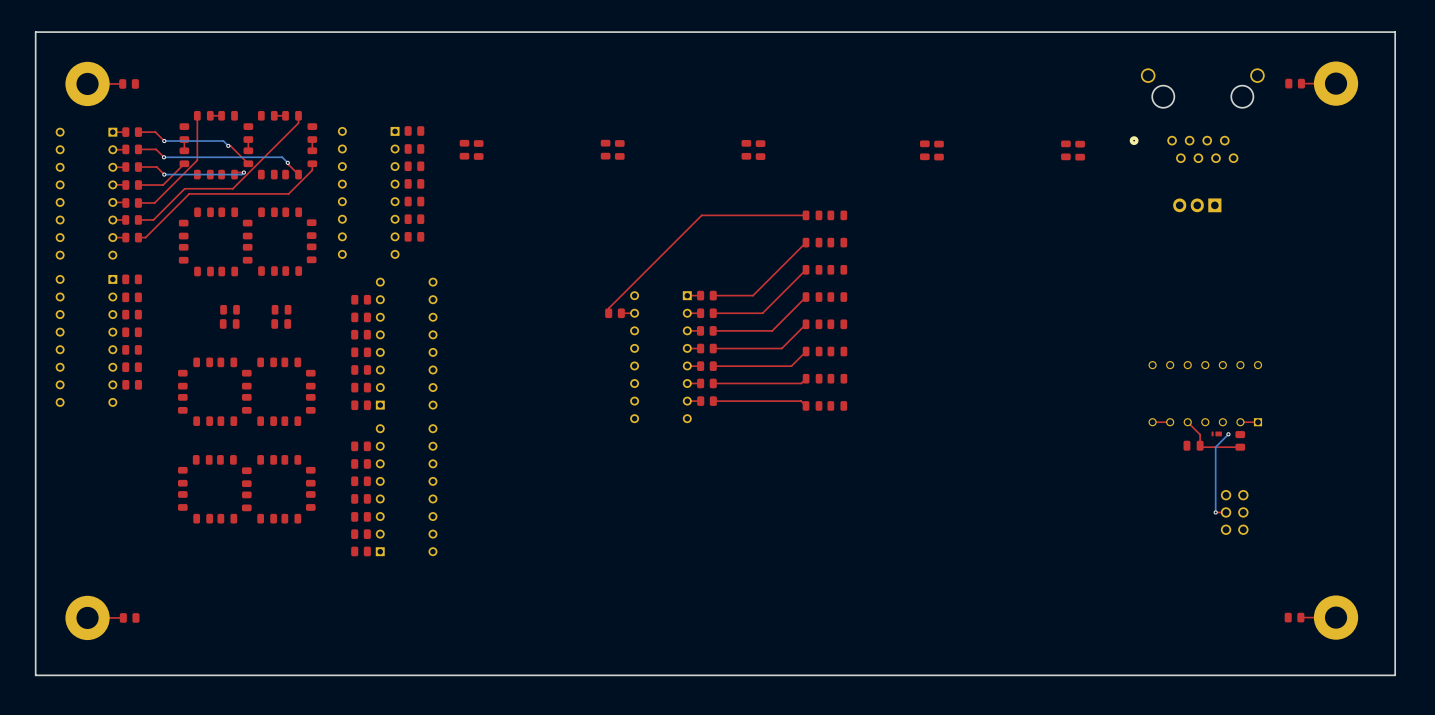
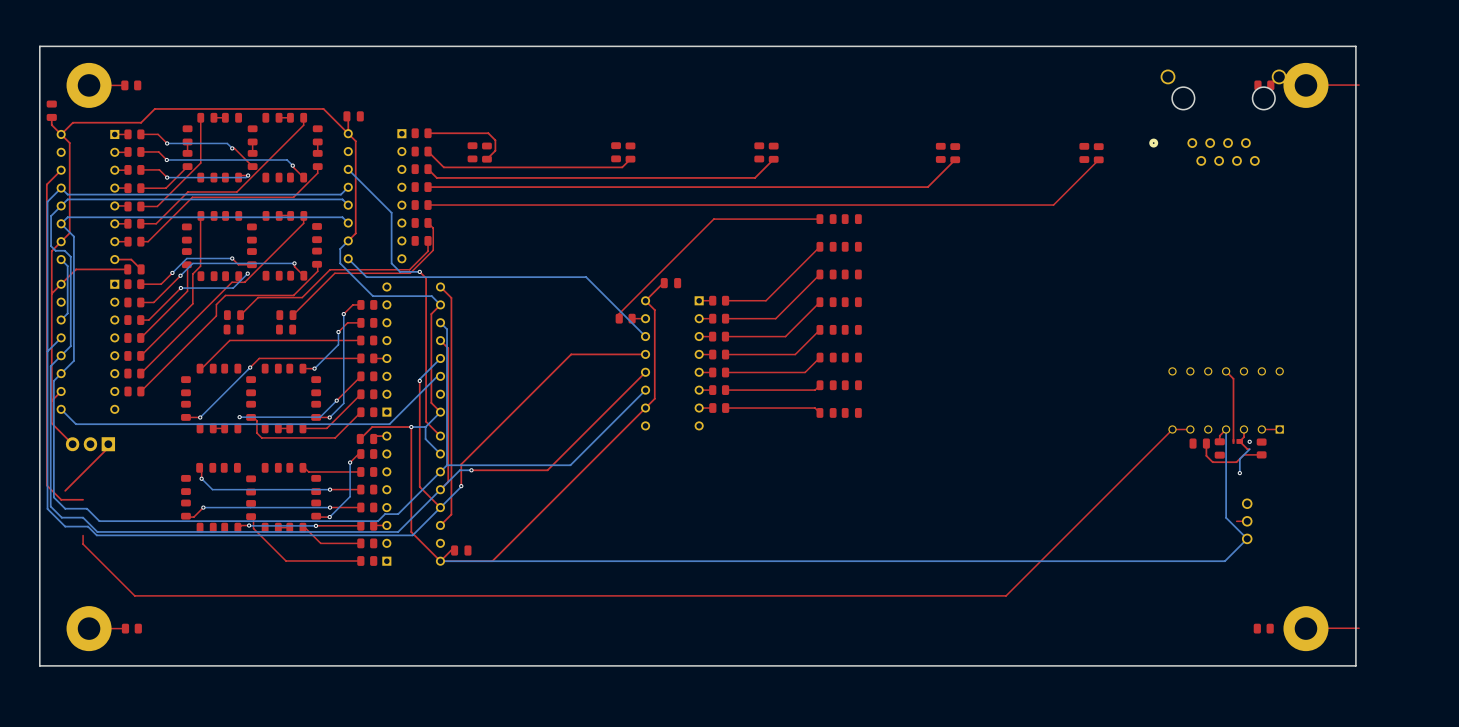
board edge: (1395, 32) (35, 32) (35, 675) (1395, 675) (1395, 32) -> (1355, 46) (1355, 665) (39, 665) (39, 46) (1355, 46)
part position: (1295, 83) -> (1264, 85)
part position: (1336, 83) -> (1305, 85)
part: none -> (51, 110)
top track: none -> (346, 116) (348, 133)
part: none -> (353, 116)
top track: none -> (51, 117) (51, 125) (69, 142) (69, 233) (51, 251) (51, 423) (72, 444)
top track: none -> (428, 133) (488, 133) (495, 140) (495, 150) (486, 159)
top track: none -> (61, 134) (72, 122) (141, 122) (154, 108) (323, 108) (355, 141) (355, 233) (348, 240)
top track: none -> (428, 151) (443, 167) (622, 167) (630, 159)
top track: none -> (773, 159) (755, 177) (436, 177) (428, 169)
top track: none -> (955, 159) (927, 187) (428, 187)
top track: none -> (1098, 159) (1053, 205) (428, 205)
bottom track: none -> (348, 169) (391, 212) (391, 263) (400, 271) (419, 271)
top track: none -> (61, 170) (46, 184) (46, 485) (61, 499) (83, 499)
bottom track: none -> (348, 187) (340, 194) (67, 194) (61, 188) (47, 201) (47, 508) (65, 526) (88, 526) (96, 535) (412, 535) (461, 486)
bottom track: none -> (348, 205) (342, 199) (67, 199) (51, 216) (51, 246) (55, 250) (64, 250) (70, 256) (70, 346) (50, 366) (50, 506) (61, 517) (83, 517) (97, 531) (398, 531) (459, 470) (471, 470)
part: (1197, 205) -> none
top track: none -> (290, 215) (279, 215)
top track: none -> (303, 215) (303, 223) (244, 282) (232, 282) (140, 373)
top track: none -> (200, 215) (200, 266) (192, 273) (192, 303) (140, 355)
bottom track: none -> (348, 223) (342, 217) (67, 217) (61, 223) (73, 236) (73, 360) (53, 380) (53, 497) (65, 508) (87, 508) (99, 521) (378, 521) (385, 514) (398, 514) (447, 465)
top track: none -> (428, 222) (433, 228) (433, 250) (410, 273) (334, 273) (293, 315)
bottom track: none -> (348, 240) (340, 248) (340, 263) (372, 296) (431, 296) (440, 304)
top track: none -> (428, 240) (428, 251) (409, 269) (330, 269) (302, 297) (258, 297) (240, 315)
top track: none -> (232, 258) (238, 264) (252, 264)
bottom track: none -> (232, 258) (186, 258) (172, 272)
via: none -> (232, 258)
bottom track: none -> (348, 258) (366, 277) (586, 277) (645, 336)
bottom track: none -> (61, 259) (67, 266) (67, 313) (61, 320)
top track: none -> (114, 259) (131, 259) (141, 269)
top track: none -> (294, 263) (294, 266) (303, 275)
bottom track: none -> (294, 263) (192, 263) (180, 275)
via: none -> (294, 263)
top track: none -> (187, 265) (187, 291) (140, 338)
top track: none -> (317, 264) (317, 271) (293, 295) (225, 295) (216, 304) (216, 315) (140, 391)
top track: none -> (127, 269) (76, 269) (51, 293)
part: none -> (134, 269)
top track: none -> (419, 271) (426, 278) (426, 421) (440, 436)
via: none -> (419, 271)
top track: none -> (172, 272) (161, 284) (140, 284)
via: none -> (172, 272)
bottom track: none -> (247, 273) (233, 288) (180, 288)
via: none -> (247, 273)
top track: none -> (180, 275) (153, 302) (140, 302)
via: none -> (180, 275)
top track: none -> (664, 283) (645, 300) (654, 310) (654, 398) (492, 561) (440, 561)
part: none -> (670, 283)
top track: none -> (440, 287) (451, 297) (451, 514) (440, 525)
top track: none -> (180, 288) (148, 320) (140, 320)
via: none -> (180, 288)
top track: none -> (360, 304) (352, 304) (343, 314)
top track: none -> (440, 304) (431, 314) (431, 402) (440, 412)
bottom track: none -> (343, 314) (343, 403) (329, 417)
via: none -> (343, 314)
top track: none -> (360, 322) (347, 322) (338, 332)
bottom track: none -> (440, 322) (447, 329) (447, 465)
bottom track: none -> (338, 332) (338, 344) (314, 368)
via: none -> (338, 332)
bottom track: none -> (61, 337) (47, 351)
top track: none -> (360, 340) (229, 340) (201, 368)
top track: none -> (440, 340) (448, 348) (448, 481) (440, 489)
top track: none -> (645, 354) (571, 354) (461, 464) (461, 486)
top track: none -> (360, 358) (259, 358) (250, 367)
top track: none -> (386, 358) (373, 358)
bottom track: none -> (440, 358) (419, 380)
bottom track: none -> (250, 367) (200, 417)
via: none -> (250, 367)
top track: none -> (314, 368) (304, 368)
via: none -> (314, 368)
top track: none -> (645, 372) (547, 470) (471, 470)
top track: none -> (1226, 371) (1233, 378) (1233, 441)
top track: none -> (360, 376) (336, 400)
bottom track: none -> (440, 376) (437, 376) (389, 424) (76, 424) (61, 409)
top track: none -> (419, 380) (419, 486) (440, 507)
via: none -> (419, 380)
bottom track: none -> (645, 390) (570, 465) (447, 465)
top track: none -> (61, 391) (51, 400)
top track: none -> (360, 394) (326, 428) (304, 428)
bottom track: none -> (336, 400) (320, 417) (239, 417)
via: none -> (336, 400)
top track: none -> (360, 412) (335, 437) (261, 437) (256, 433) (256, 420) (253, 417)
bottom track: none -> (440, 412) (425, 427)
top track: none -> (200, 417) (188, 417)
via: none -> (200, 417)
via: none -> (239, 417)
top track: none -> (329, 417) (318, 417)
via: none -> (329, 417)
via: none -> (411, 427)
bottom track: none -> (425, 427) (425, 439) (440, 453)
bottom track: none -> (425, 427) (411, 427)
top track: none -> (226, 428) (214, 428)
top track: none -> (291, 428) (279, 428)
top track: none -> (1172, 429) (1006, 595) (134, 595) (83, 544) (83, 535)
top track: (1187, 422) (1200, 434) (1201, 447) (1222, 447) -> (1206, 443) (1206, 455) (1212, 462) (1236, 462) (1243, 454)
top track: none -> (1226, 429) (1219, 435) (1219, 441)
bottom track: none -> (1226, 429) (1226, 517) (1247, 538) (1224, 561) (440, 561)
top track: none -> (1243, 429) (1243, 437) (1239, 441) (1249, 449)
top track: none -> (386, 436) (376, 436) (373, 438)
top track: none -> (360, 438) (372, 427) (411, 427) (411, 532) (440, 561)
part: none -> (366, 438)
bottom track: (1228, 434) (1215, 447) (1215, 512) -> none
part: none -> (90, 444)
top track: none -> (108, 444) (108, 447) (65, 490)
part: none -> (1199, 443)
bottom track: none -> (1249, 449) (1239, 459) (1239, 473)
part rotation: 0° (1193, 445) -> 90° clockwise (1219, 448)
top track: none -> (360, 454) (350, 462)
bottom track: none -> (350, 462) (350, 496) (329, 517)
via: none -> (350, 462)
top track: none -> (201, 467) (201, 478)
top track: none -> (304, 467) (308, 471) (360, 471)
via: none -> (471, 470)
via: none -> (1239, 473)
bottom track: none -> (201, 478) (212, 489) (330, 489)
via: none -> (201, 478)
via: none -> (461, 486)
via: none -> (330, 489)
top track: none -> (360, 489) (330, 489)
top track: none -> (203, 507) (193, 517) (188, 517)
via: none -> (203, 507)
bottom track: none -> (330, 507) (203, 507)
via: none -> (330, 507)
top track: none -> (360, 507) (330, 507)
top track: none -> (253, 516) (253, 528) (286, 560) (360, 560)
top track: none -> (329, 517) (318, 517)
via: none -> (329, 517)
via: (1215, 512) -> none
part: none -> (1247, 521)
part: (1234, 512) -> none
top track: none -> (249, 525) (241, 525) (239, 527)
bottom track: none -> (249, 525) (315, 525)
via: none -> (249, 525)
via: none -> (315, 525)
top track: none -> (360, 525) (316, 525)
top track: none -> (386, 525) (373, 525)
top track: none -> (291, 527) (280, 527)
top track: none -> (304, 527) (320, 543) (360, 543)
top track: none -> (454, 550) (451, 550) (440, 561)
part: none -> (461, 550)
part position: (1294, 617) -> (1263, 628)
part position: (1336, 617) -> (1305, 628)

